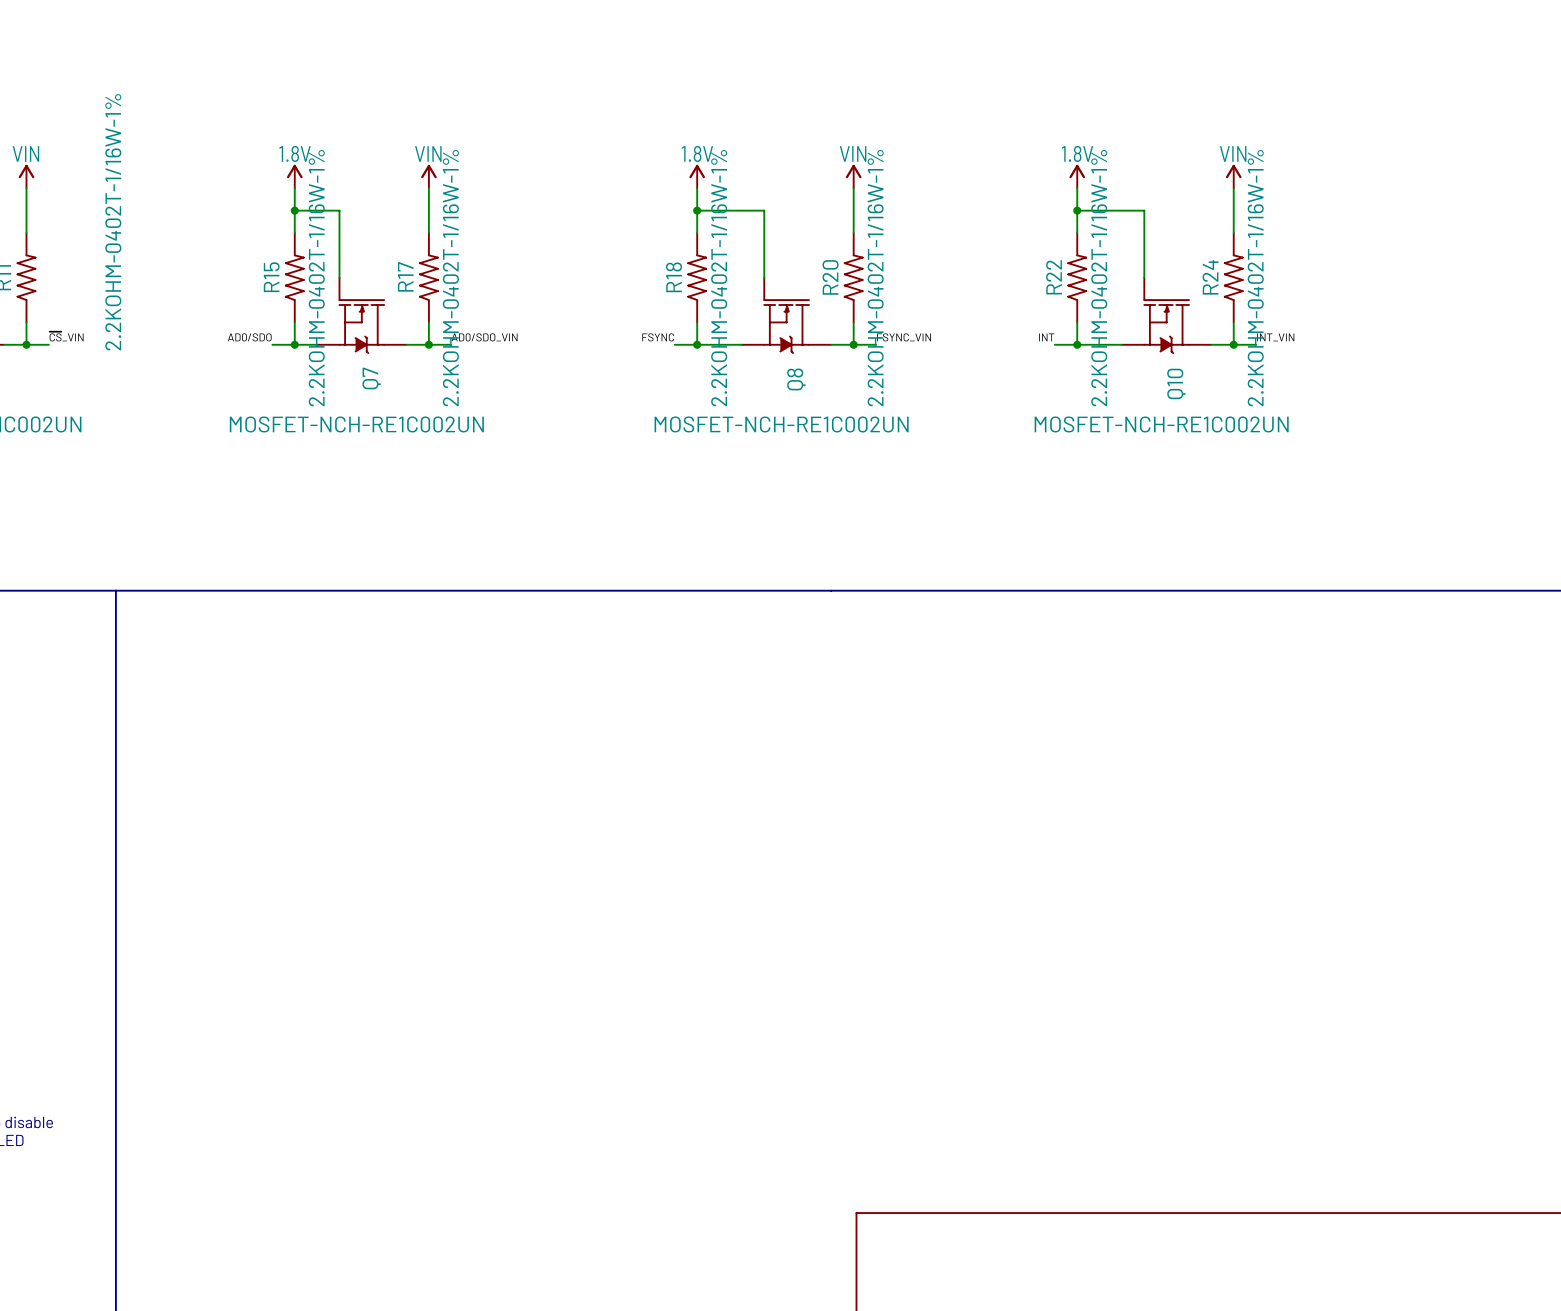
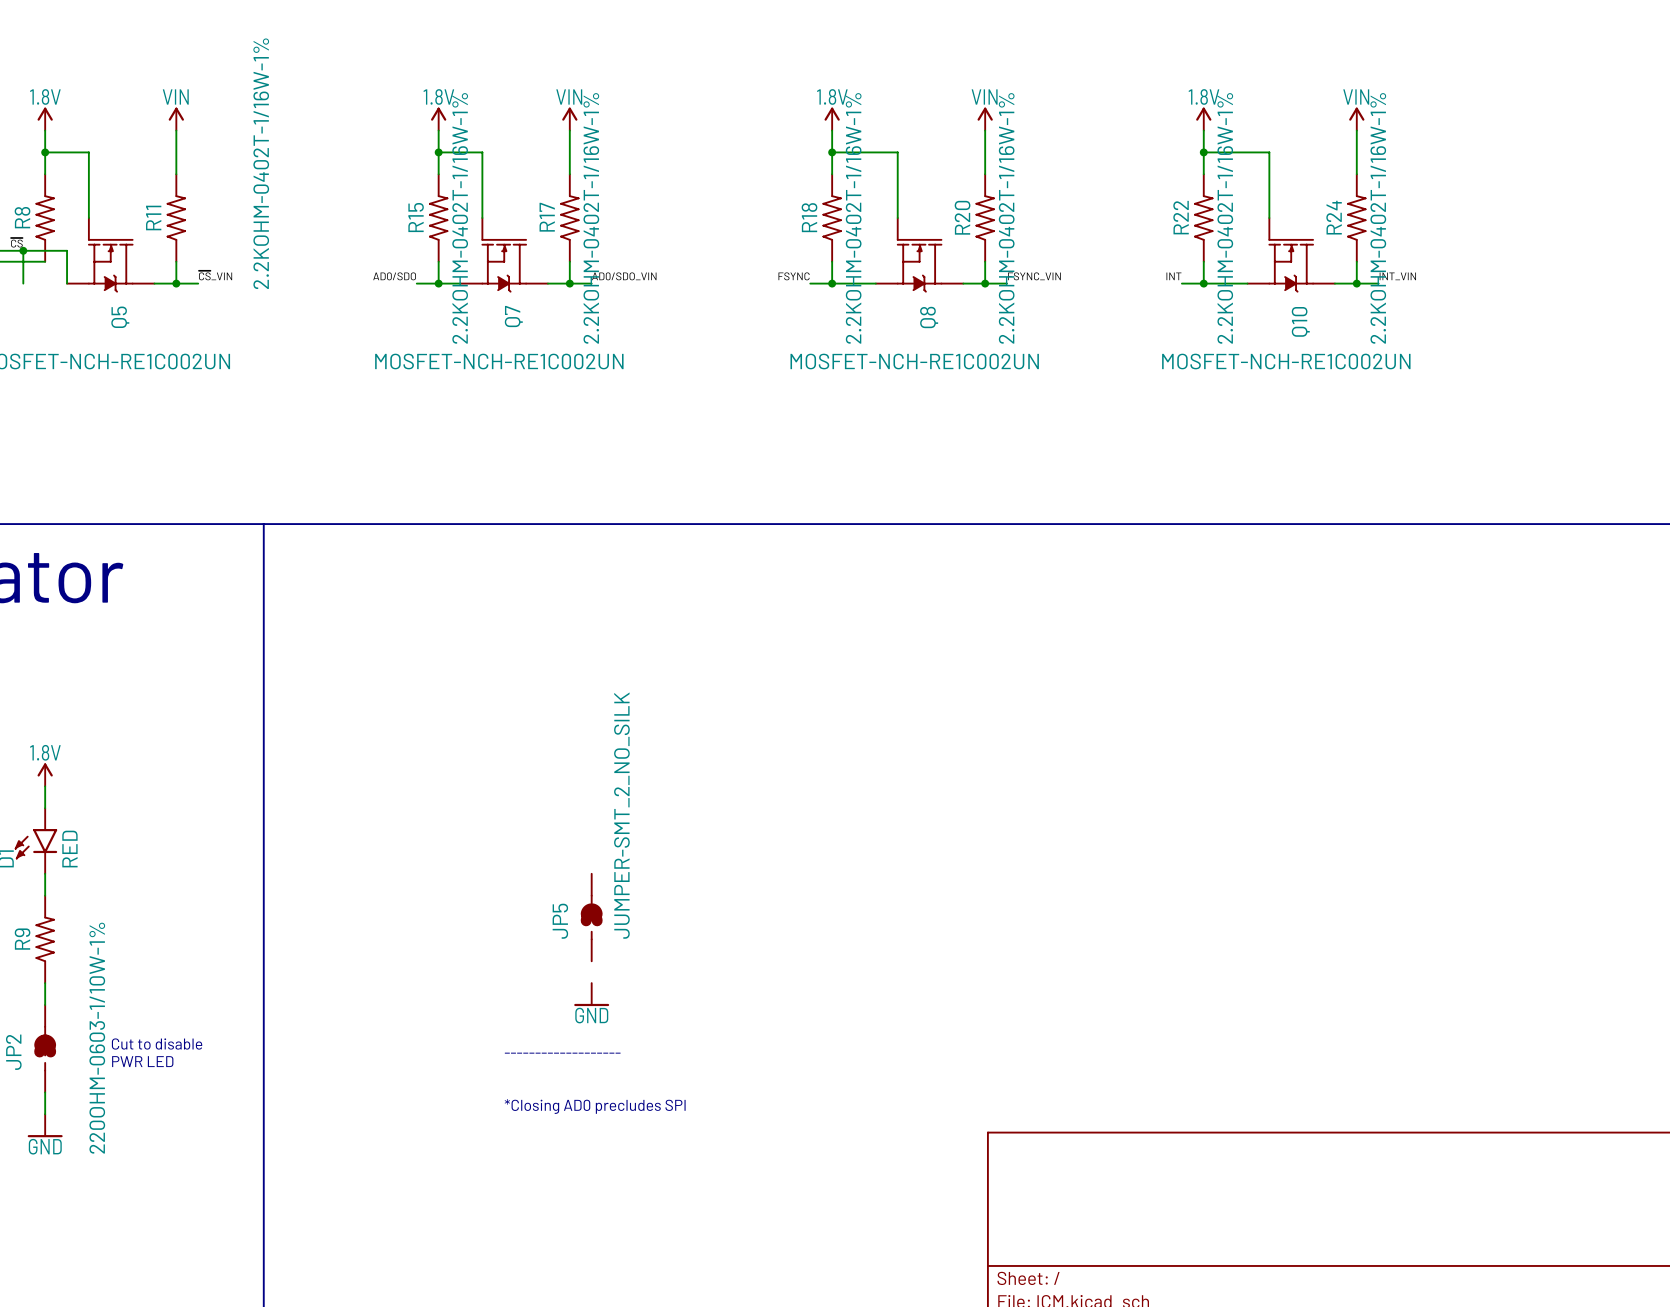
JP5: none -> JUMPER-SMT_2_NO_SILK (591, 917)
power symbol: none -> GND (591, 994)
text: none -> ------------------- (562, 1053)
text: none -> *Closing AD0 precludes SPI (595, 1106)

